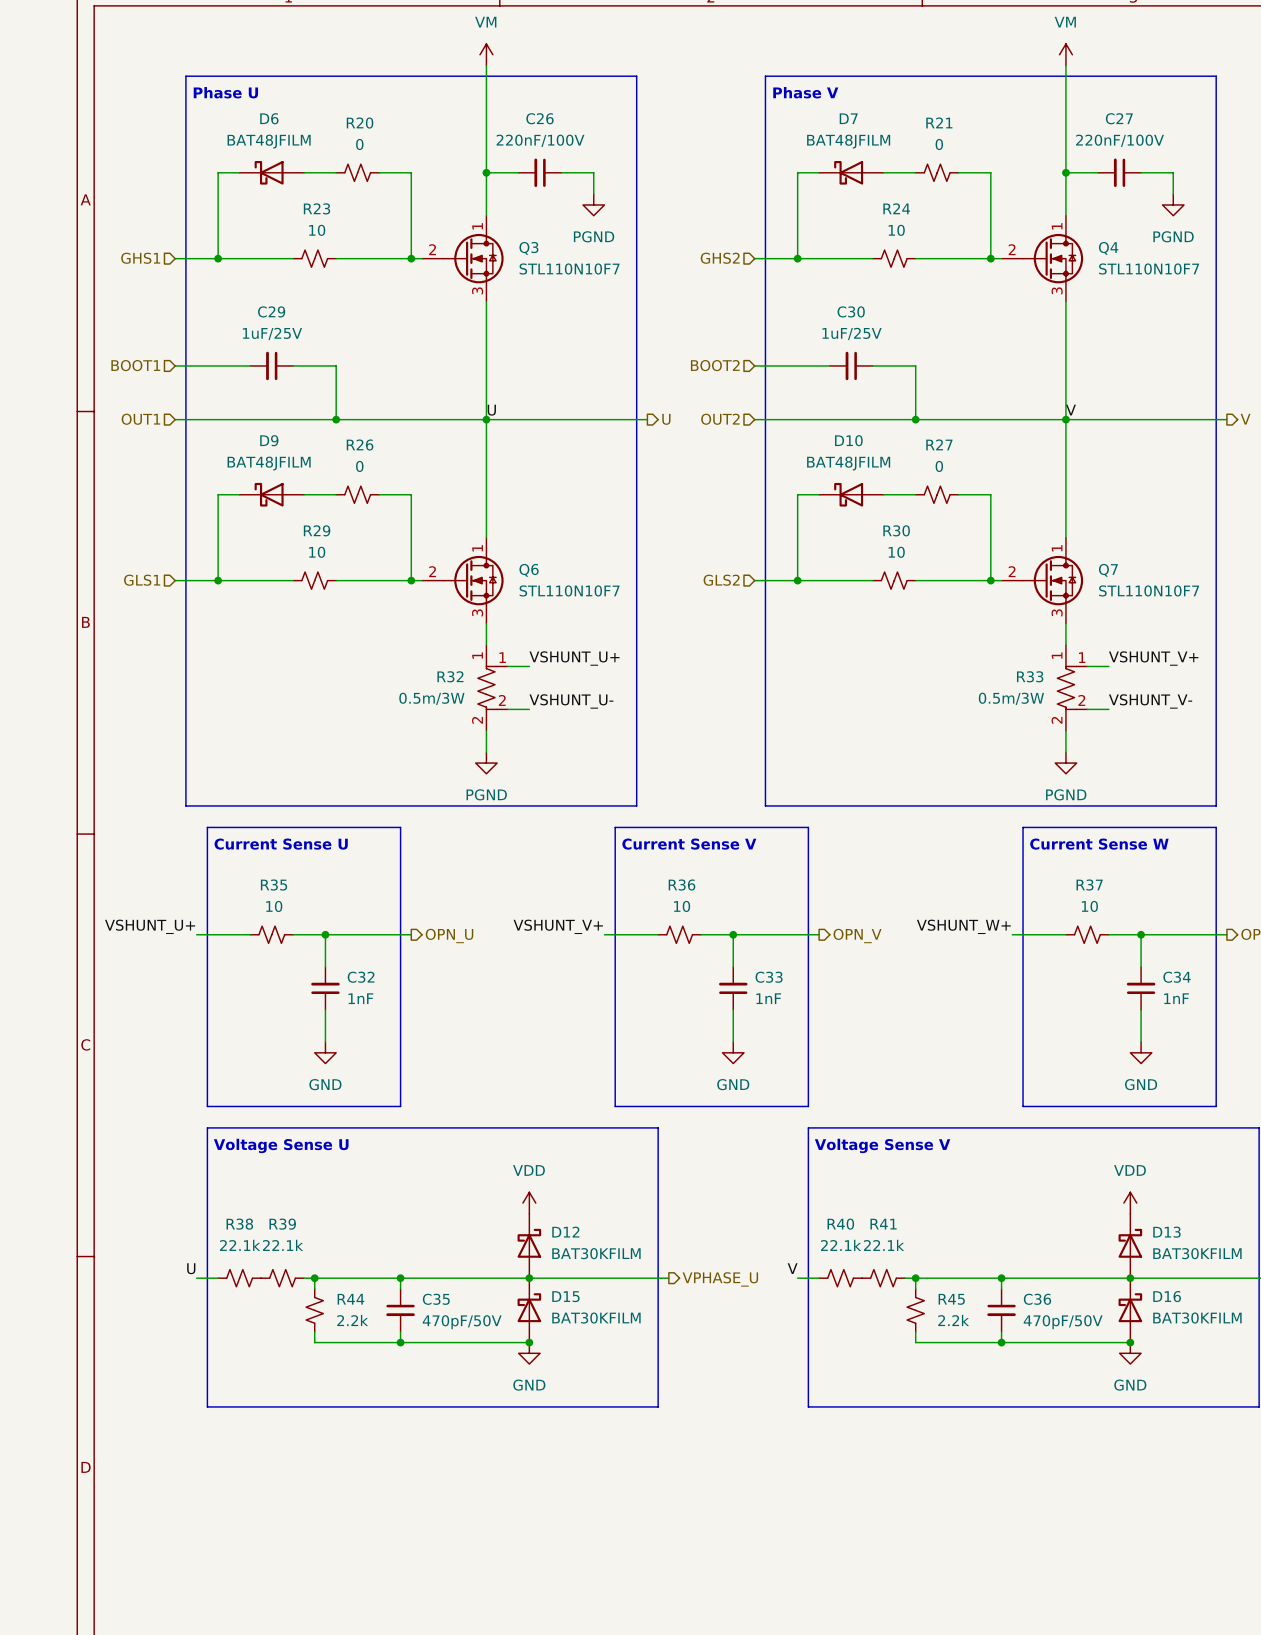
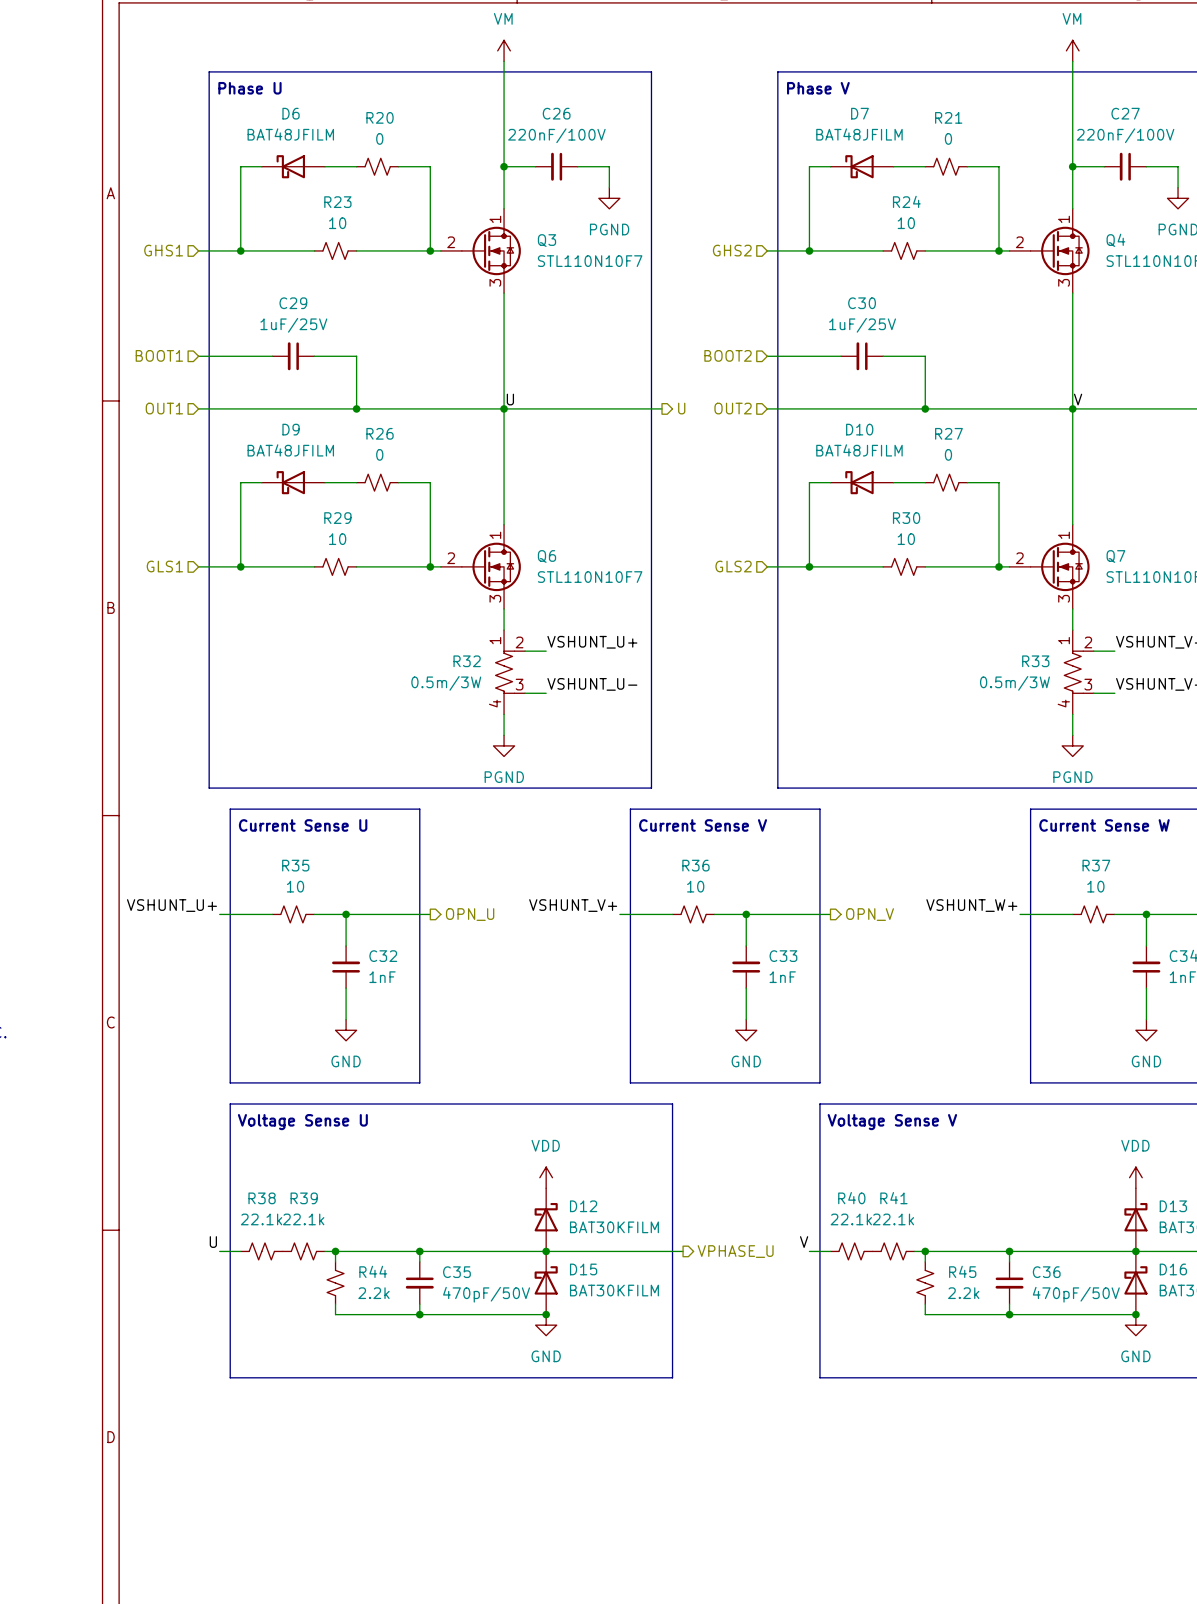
R32 pin number: 1 (502, 657) -> 2 (519, 642)
R33 pin number: 1 (1082, 657) -> 2 (1088, 642)
R32 pin number: 2 (502, 700) -> 3 (519, 684)
R33 pin number: 2 (1081, 700) -> 3 (1088, 684)
R32 pin number: 2 (477, 720) -> 4 (495, 703)
R33 pin number: 2 (1057, 720) -> 4 (1063, 703)

